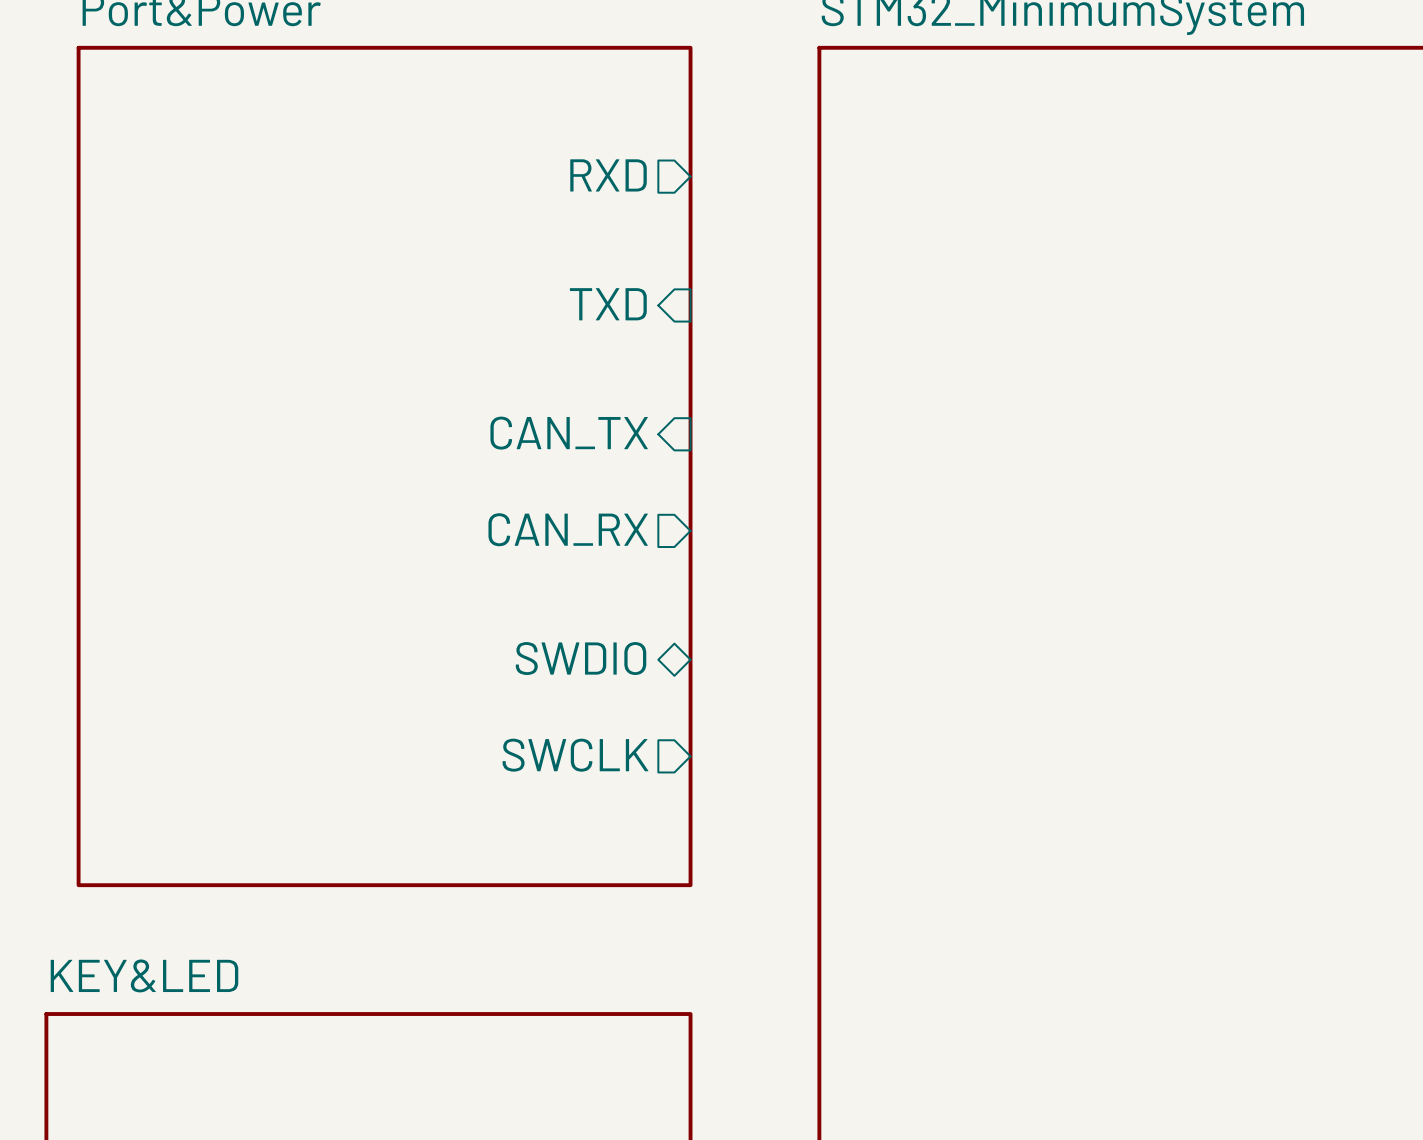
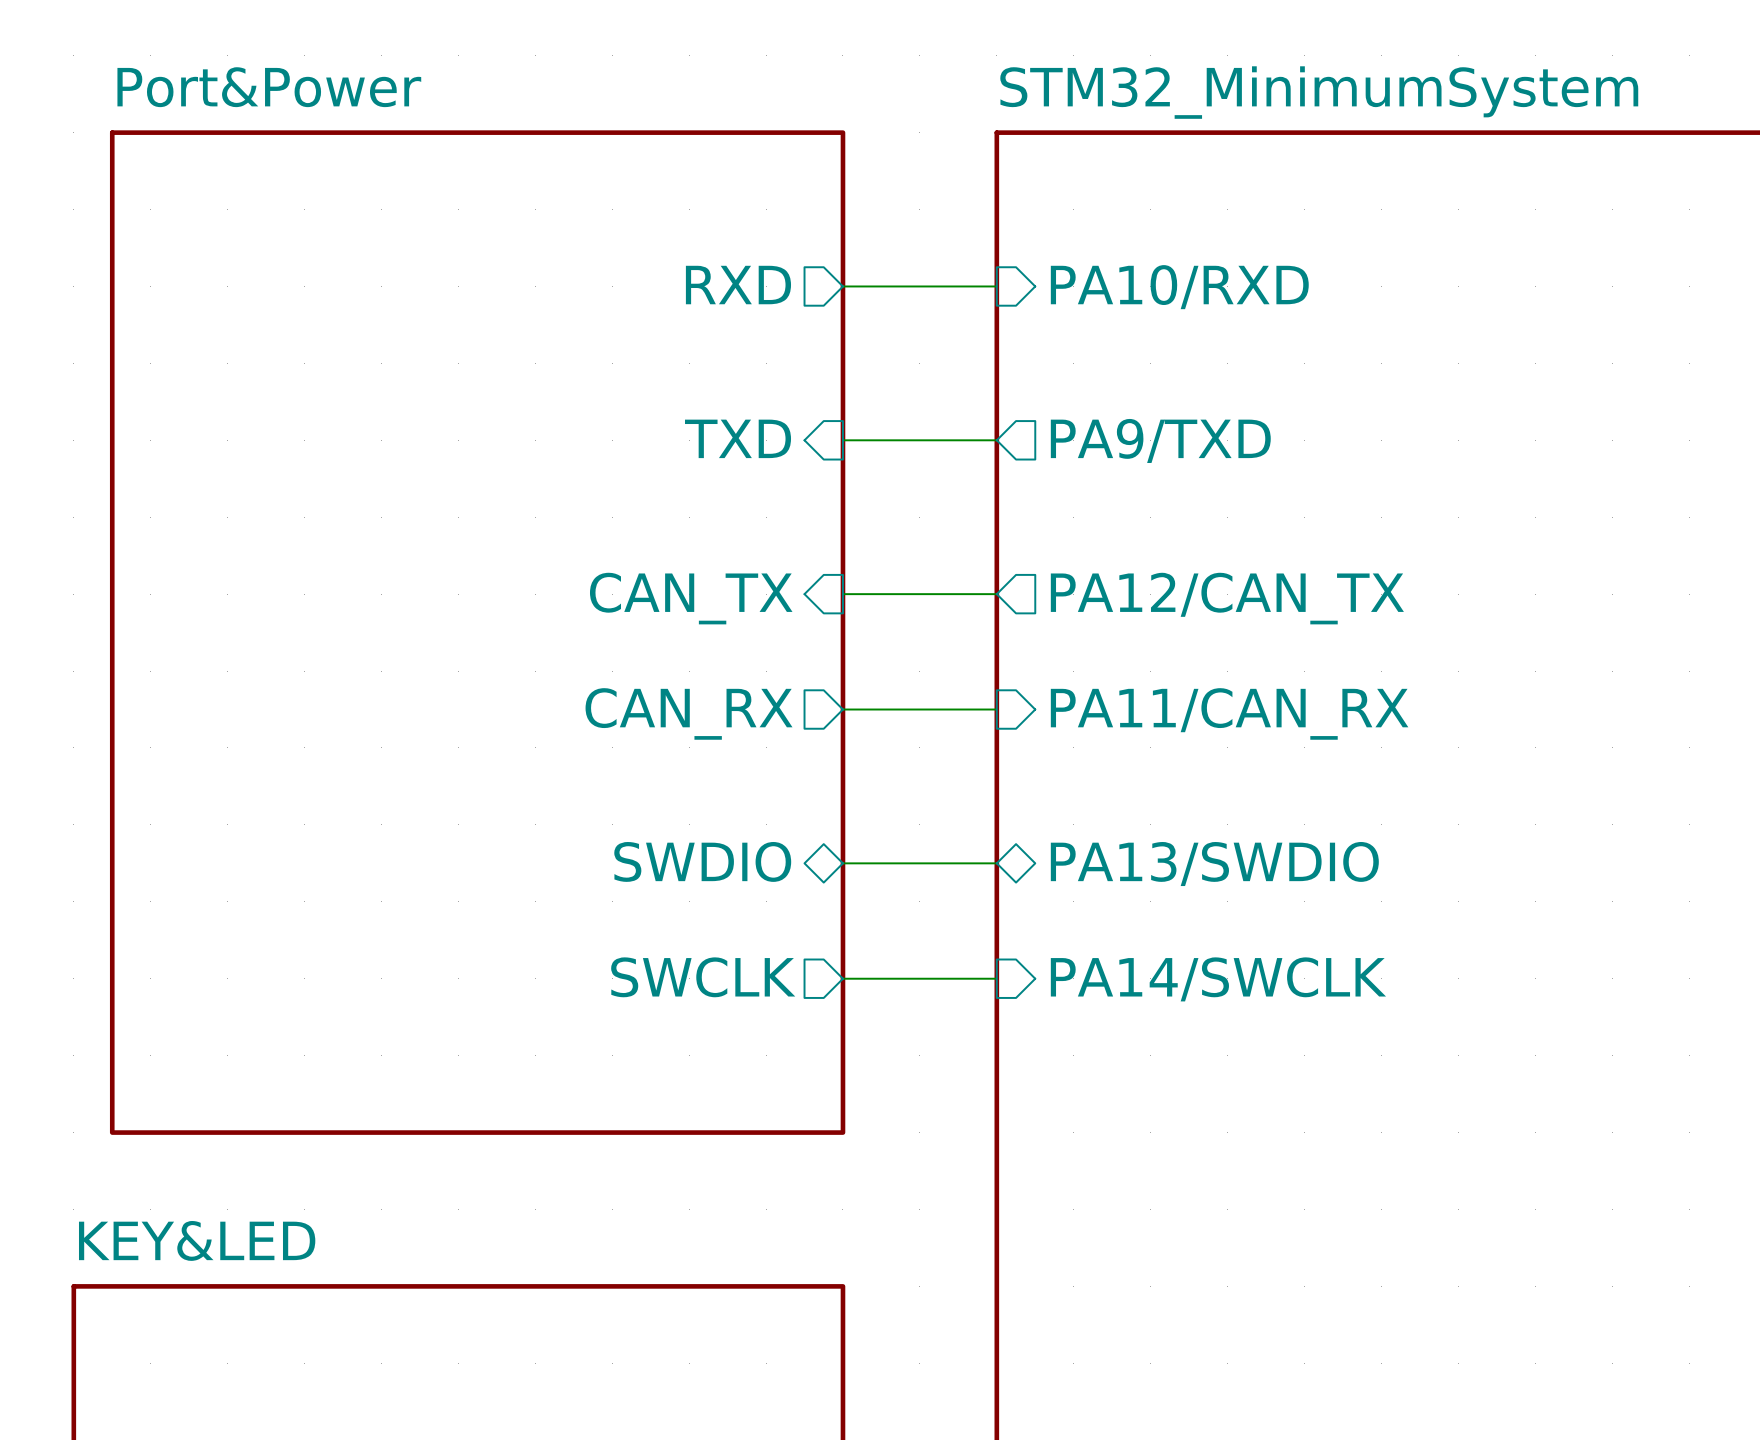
sheet pin: none -> PA10/RXD (1179, 287)
wire: none -> (842, 286) (996, 286)
sheet pin: none -> PA9/TXD (1160, 440)
wire: none -> (842, 440) (996, 440)
sheet pin: none -> PA12/CAN_TX (1227, 598)
wire: none -> (842, 594) (996, 594)
sheet pin: none -> PA11/CAN_RX (1229, 713)
wire: none -> (842, 709) (996, 709)
sheet pin: none -> PA13/SWDIO (1214, 864)
wire: none -> (842, 863) (996, 863)
sheet pin: none -> PA14/SWCLK (1218, 979)
wire: none -> (842, 978) (996, 978)

